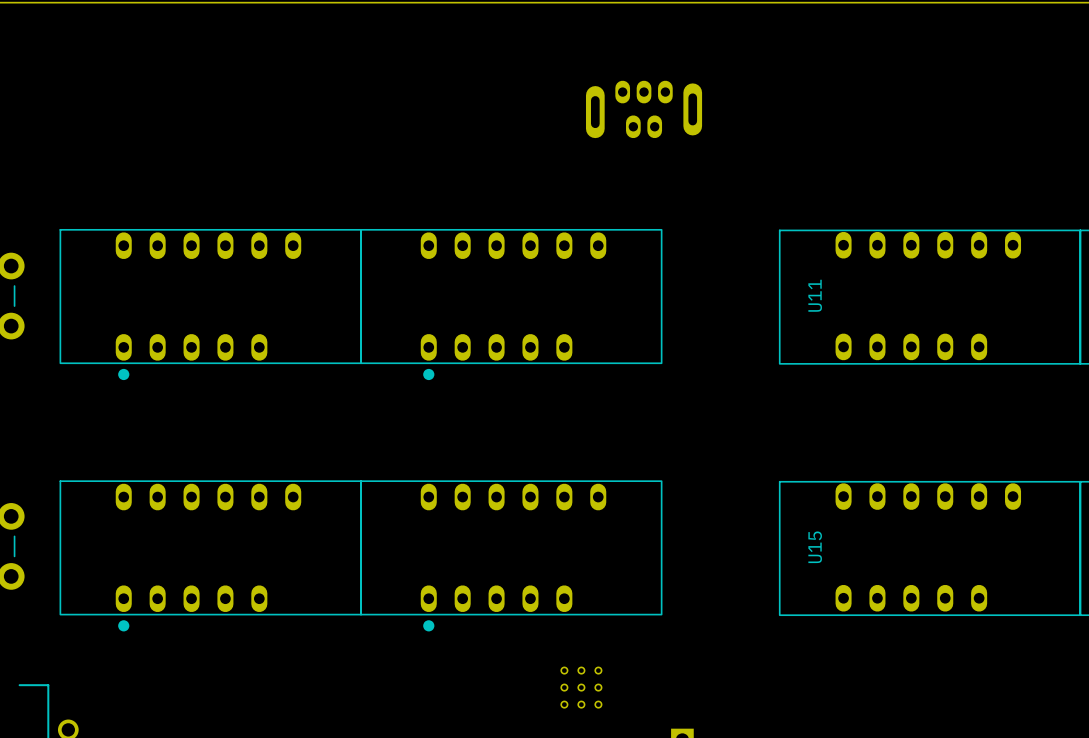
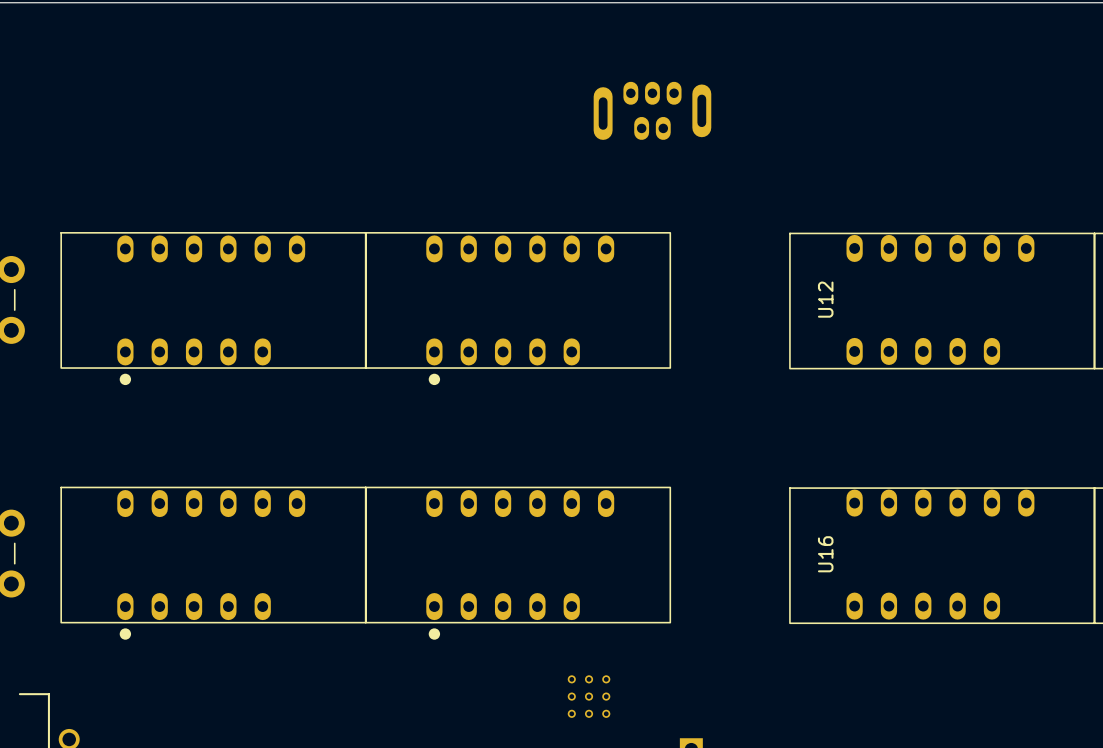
U11 name: U11 (815, 295) -> U12 (825, 299)
U15 name: U15 (815, 547) -> U16 (825, 554)

